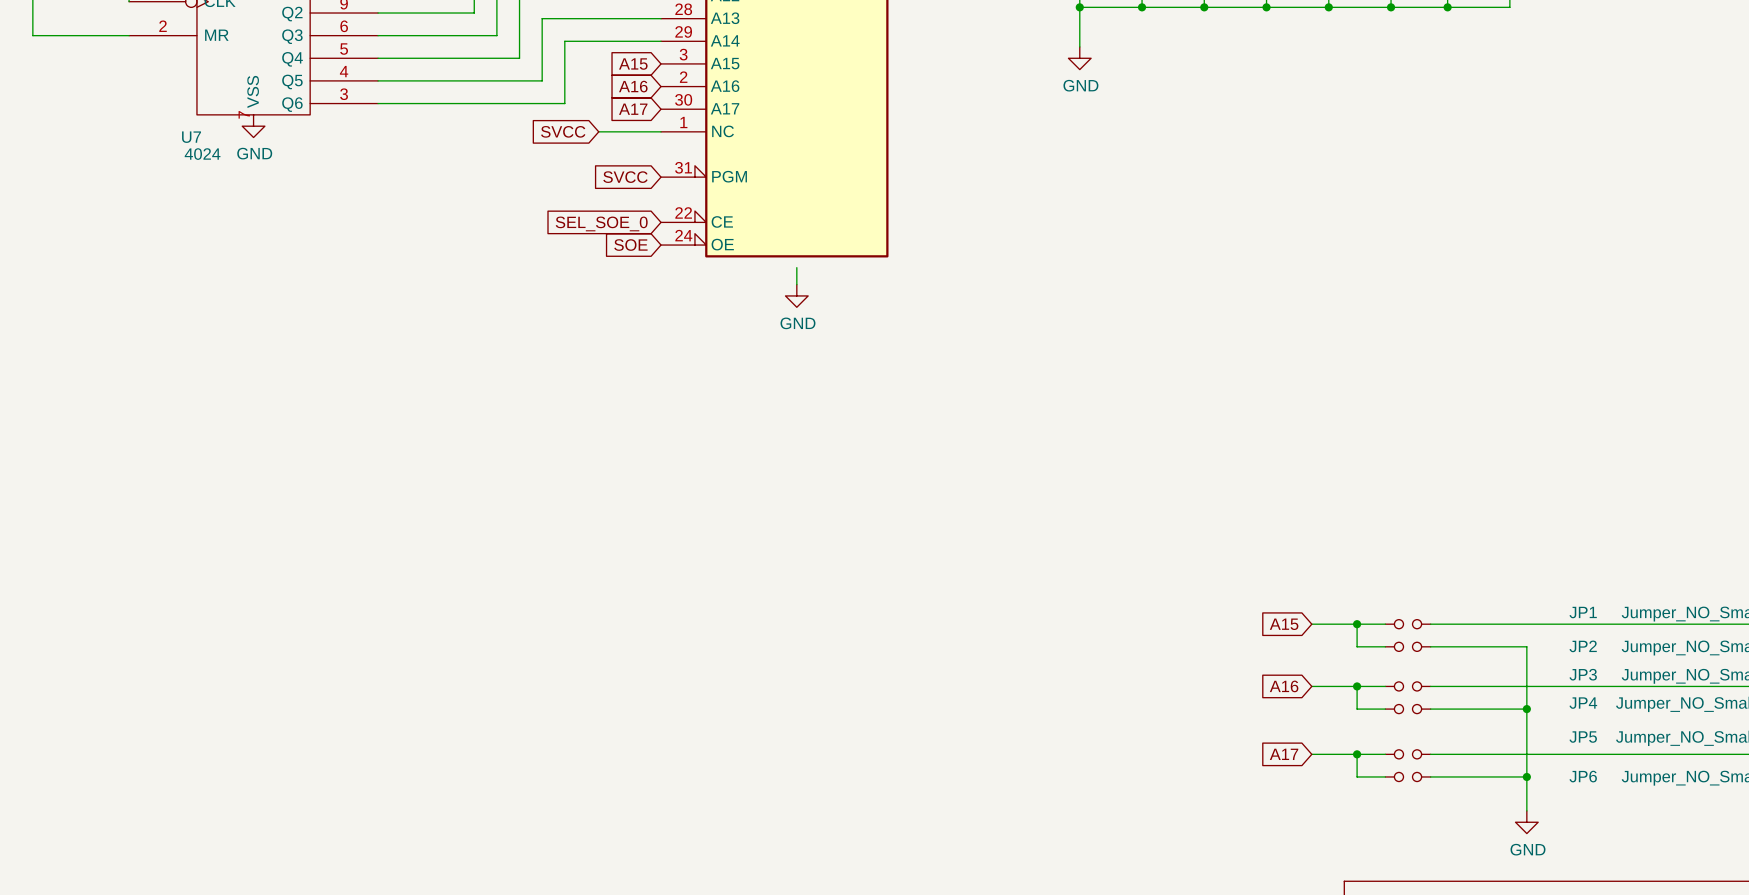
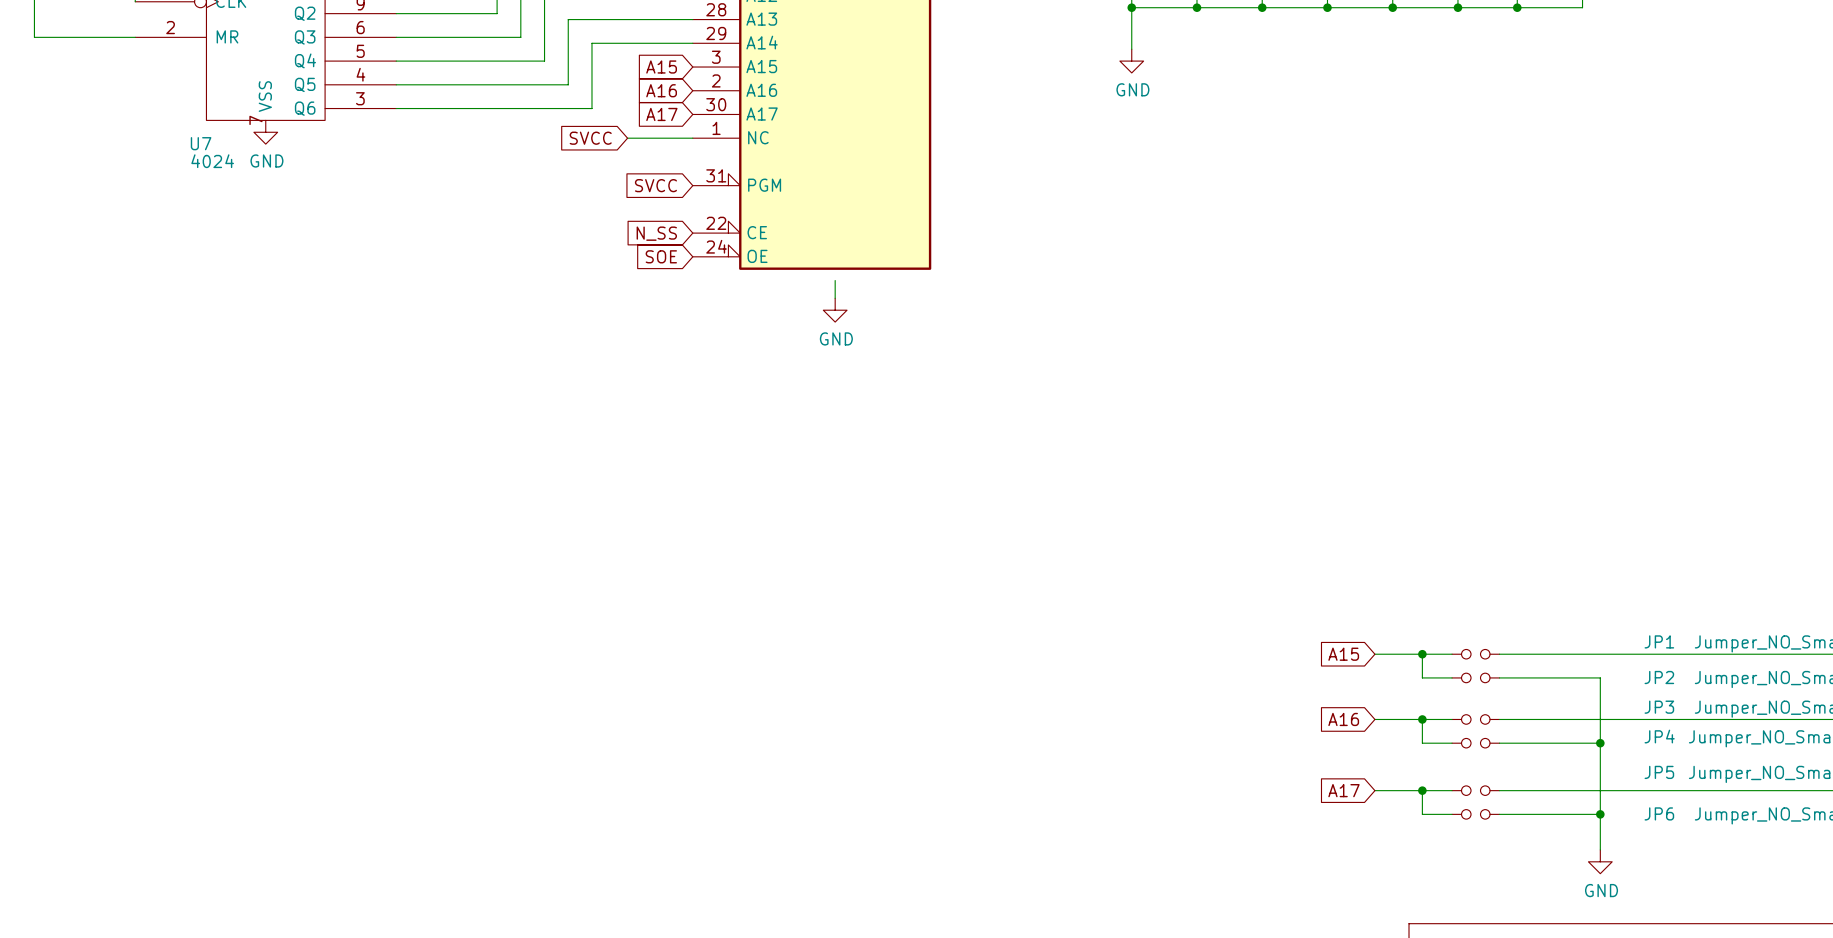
global label: SEL_SOE_0 (601, 223) -> N_SS (656, 233)

